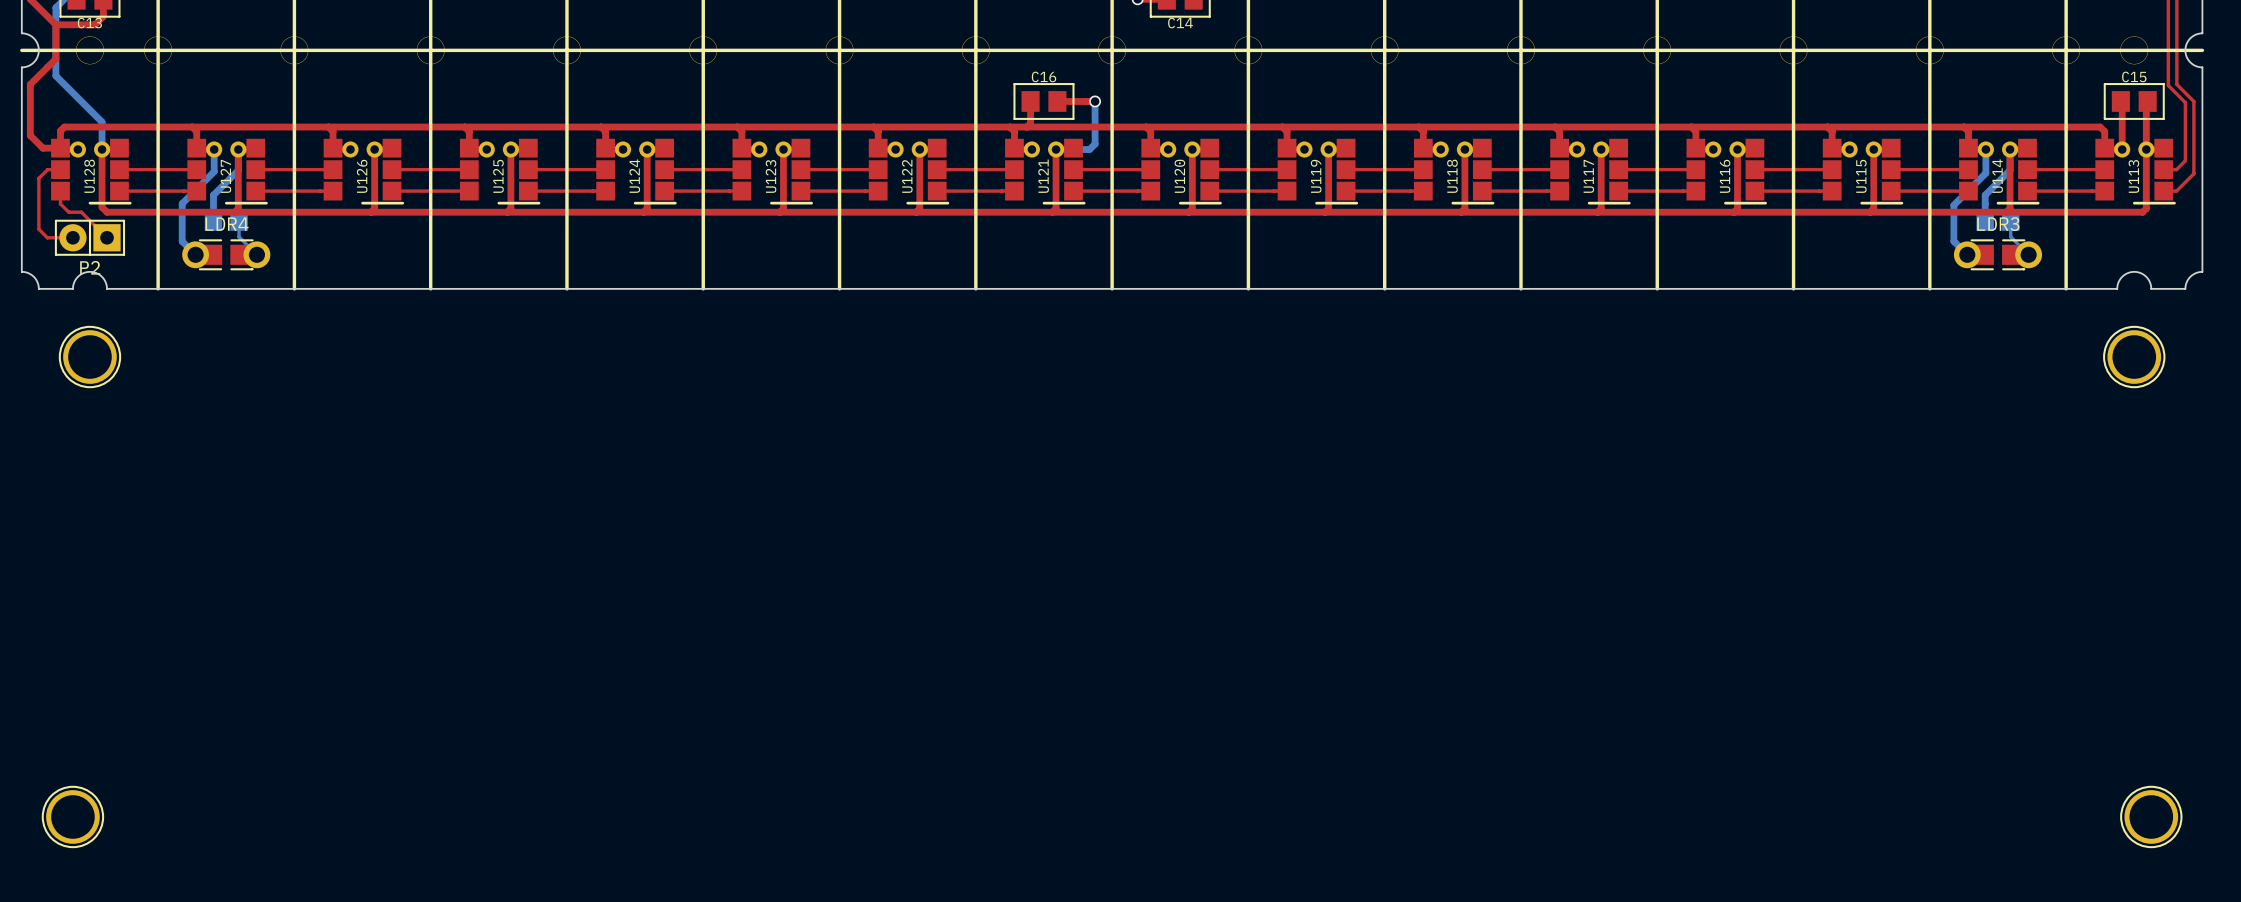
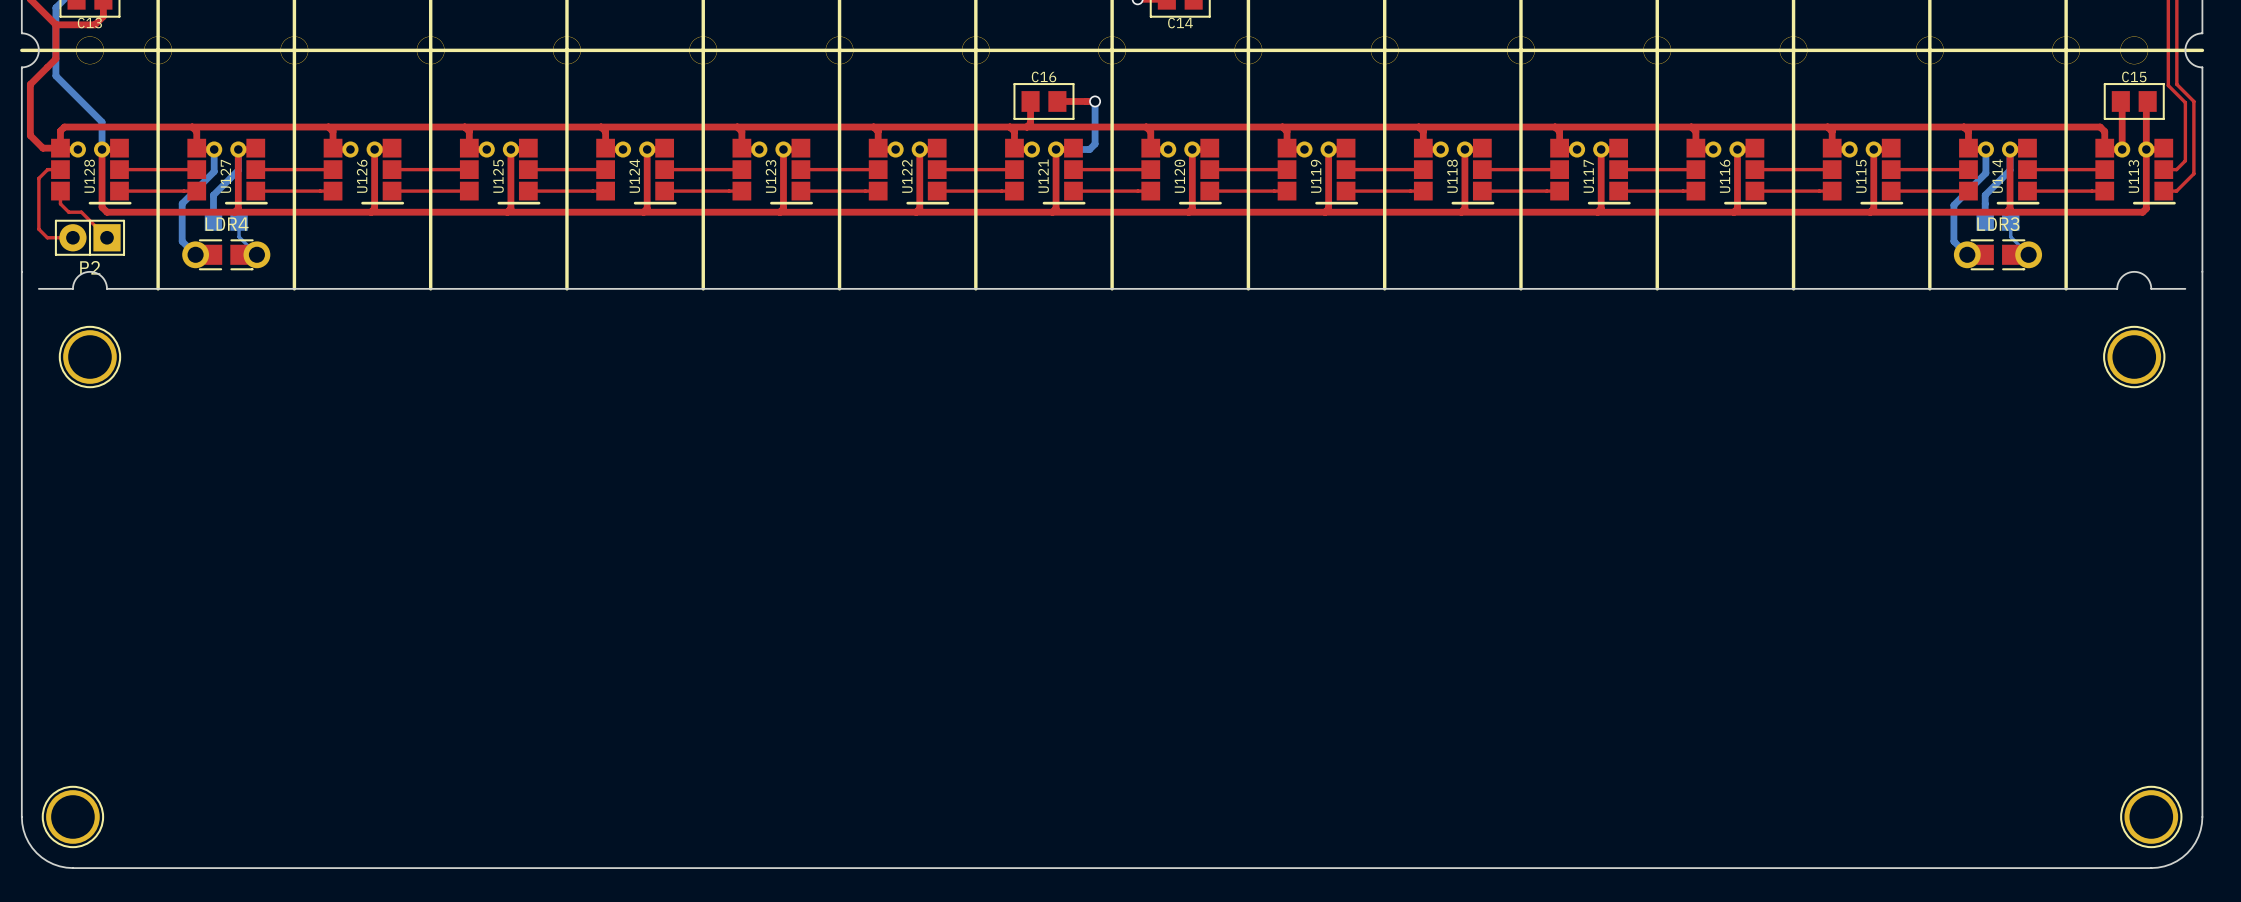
board edge: (21, 271) (33, 276) (38, 288) -> (21, 271) (22, 823) (25, 836) (36, 853) (53, 864) (72, 868) (2151, 868) (2164, 866) (2176, 861) (2191, 848) (2200, 830) (2202, 816) (2202, 271)
board edge: (2202, 271) (2190, 276) (2185, 288) -> none

